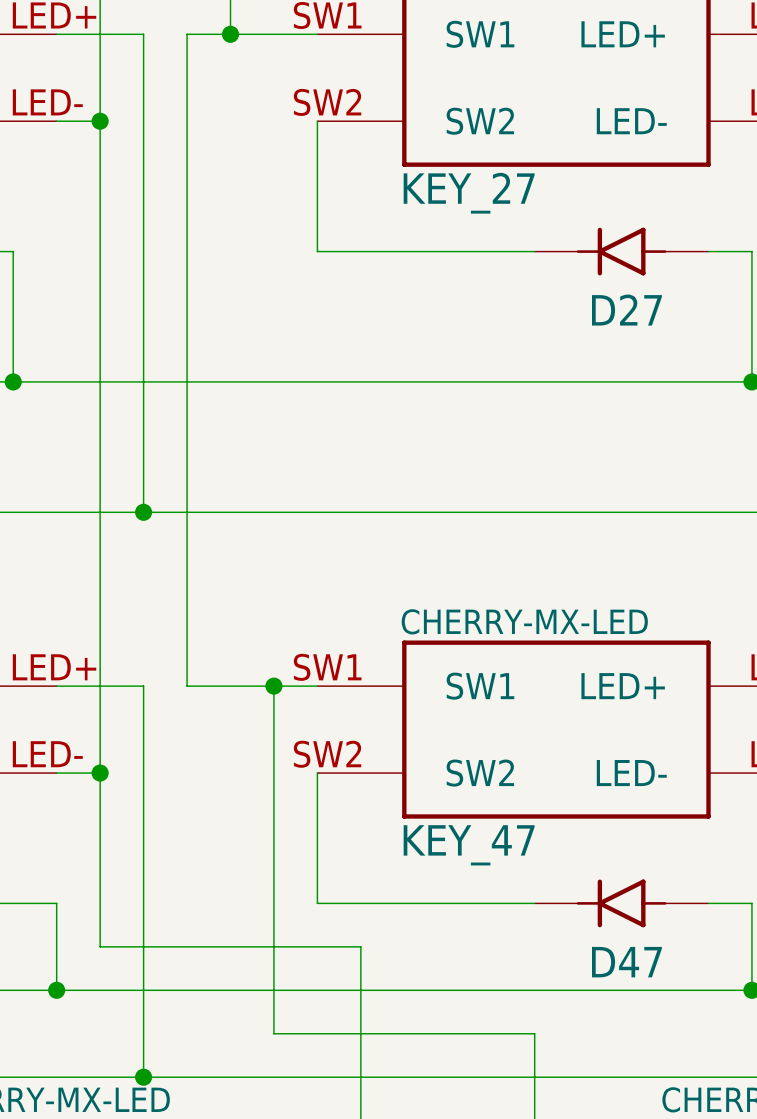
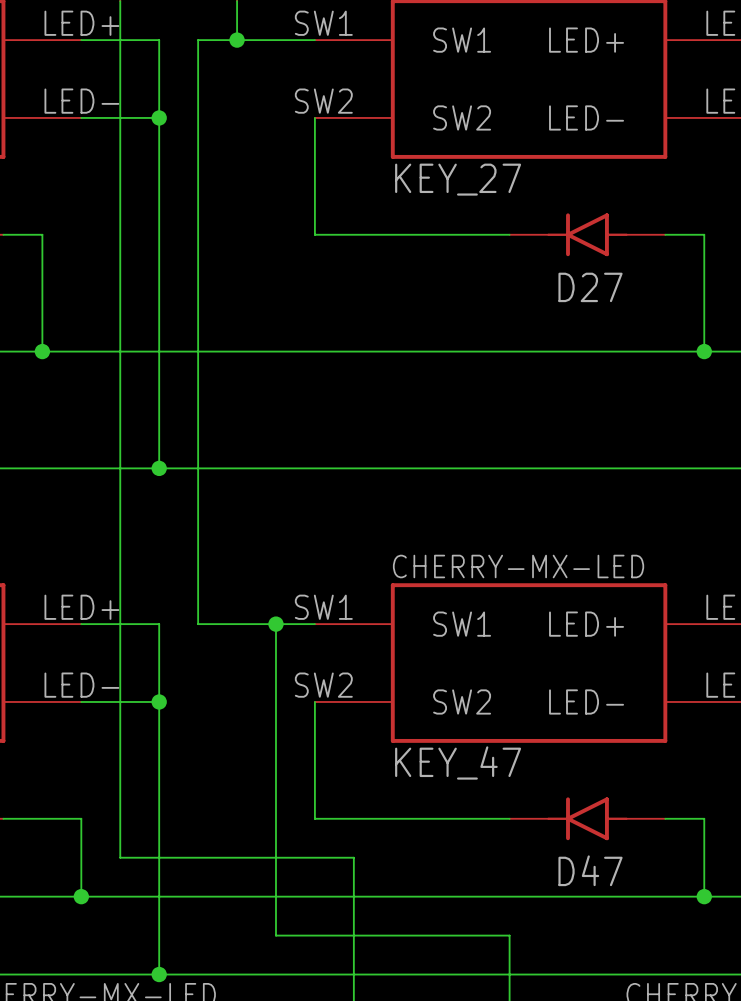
wire: none -> (120, 117) (159, 117)
junction position: (100, 121) -> (159, 117)
wire: none -> (120, 701) (159, 701)
junction position: (100, 773) -> (159, 701)

